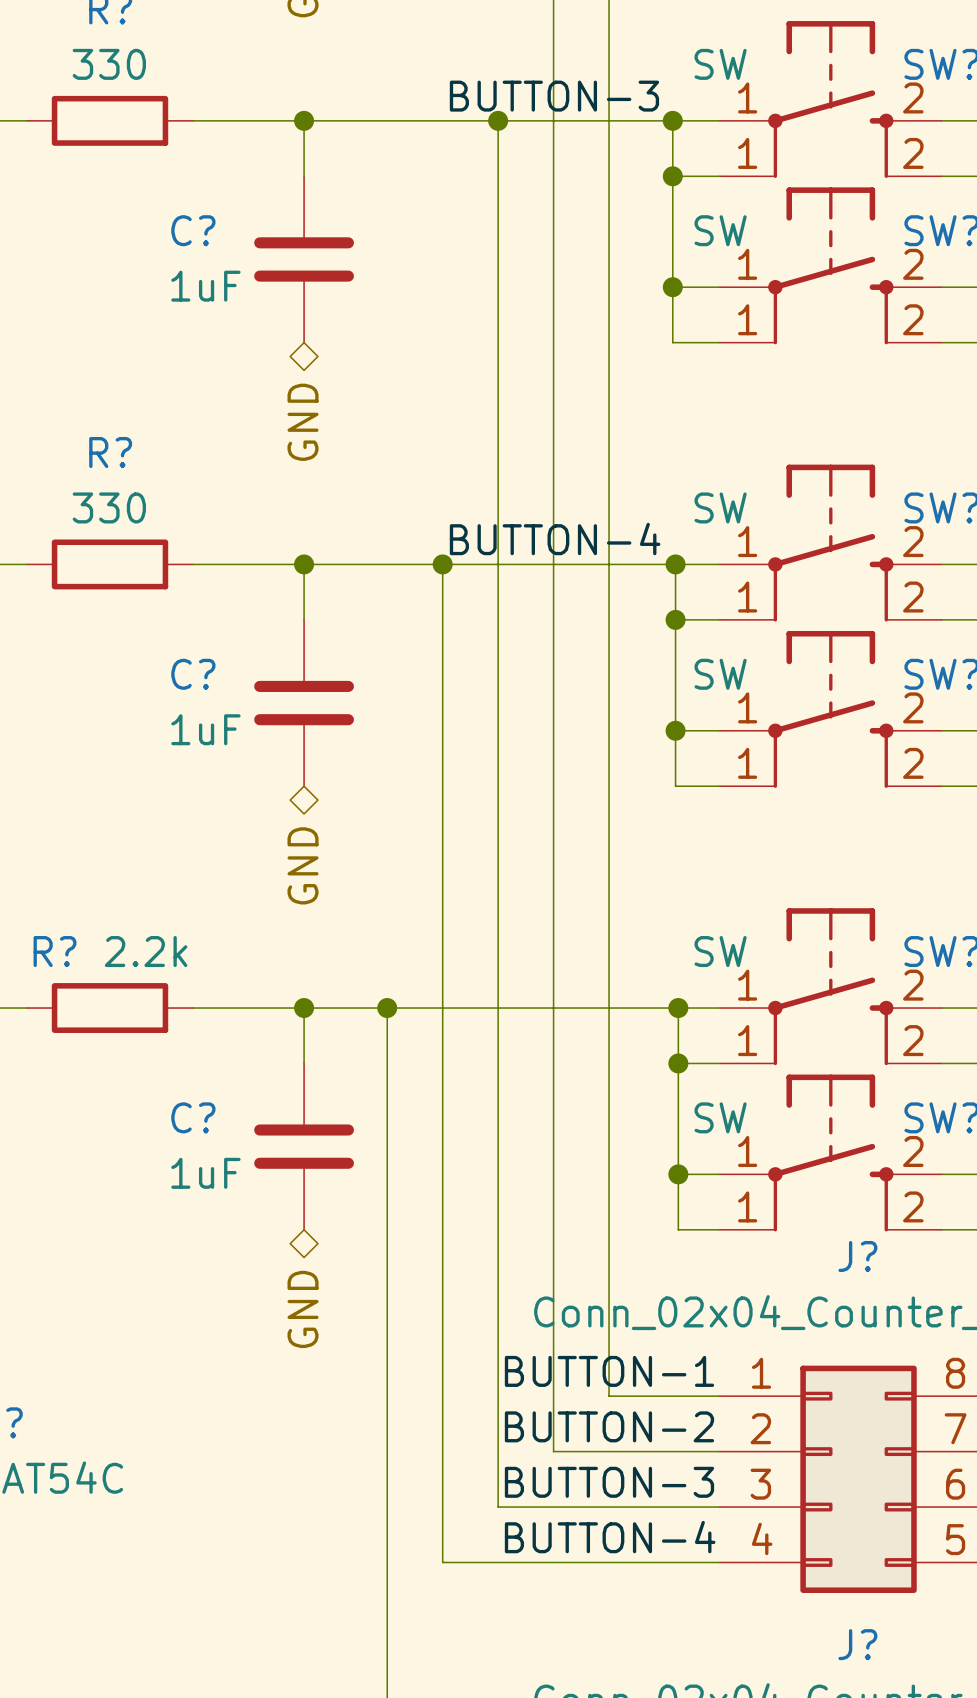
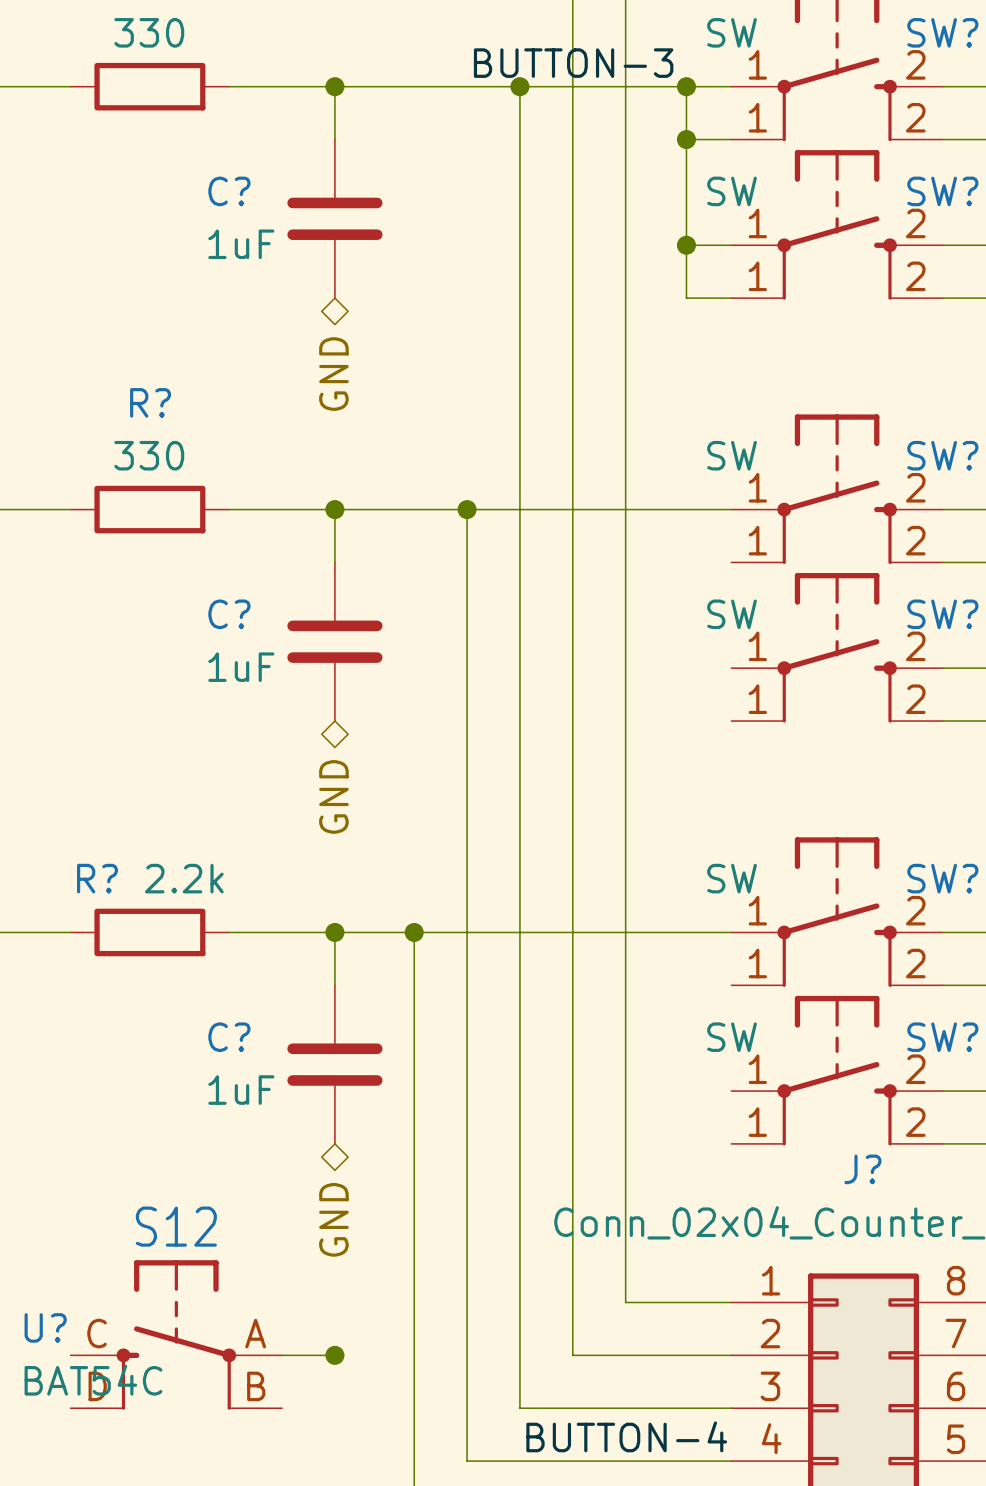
label: BUTTON-4 (555, 539) -> none
wire: (675, 564) (675, 786) (719, 786) -> none
junction: (675, 564) -> none
wire: (675, 619) (719, 619) -> none
junction: (675, 619) -> none
wire: (675, 730) (719, 730) -> none
junction: (675, 730) -> none
wire: (678, 1008) (678, 1229) (719, 1229) -> none
junction: (678, 1008) -> none
wire: (678, 1063) (719, 1063) -> none
junction: (678, 1063) -> none
wire: (678, 1174) (719, 1174) -> none
junction: (678, 1174) -> none
label: BUTTON-1 (609, 1371) -> none
label: BUTTON-2 (609, 1426) -> none
S12: none -> (176, 1335)
wire: none -> (282, 1355) (334, 1355)
junction: none -> (334, 1355)
label: BUTTON-3 (609, 1482) -> none

